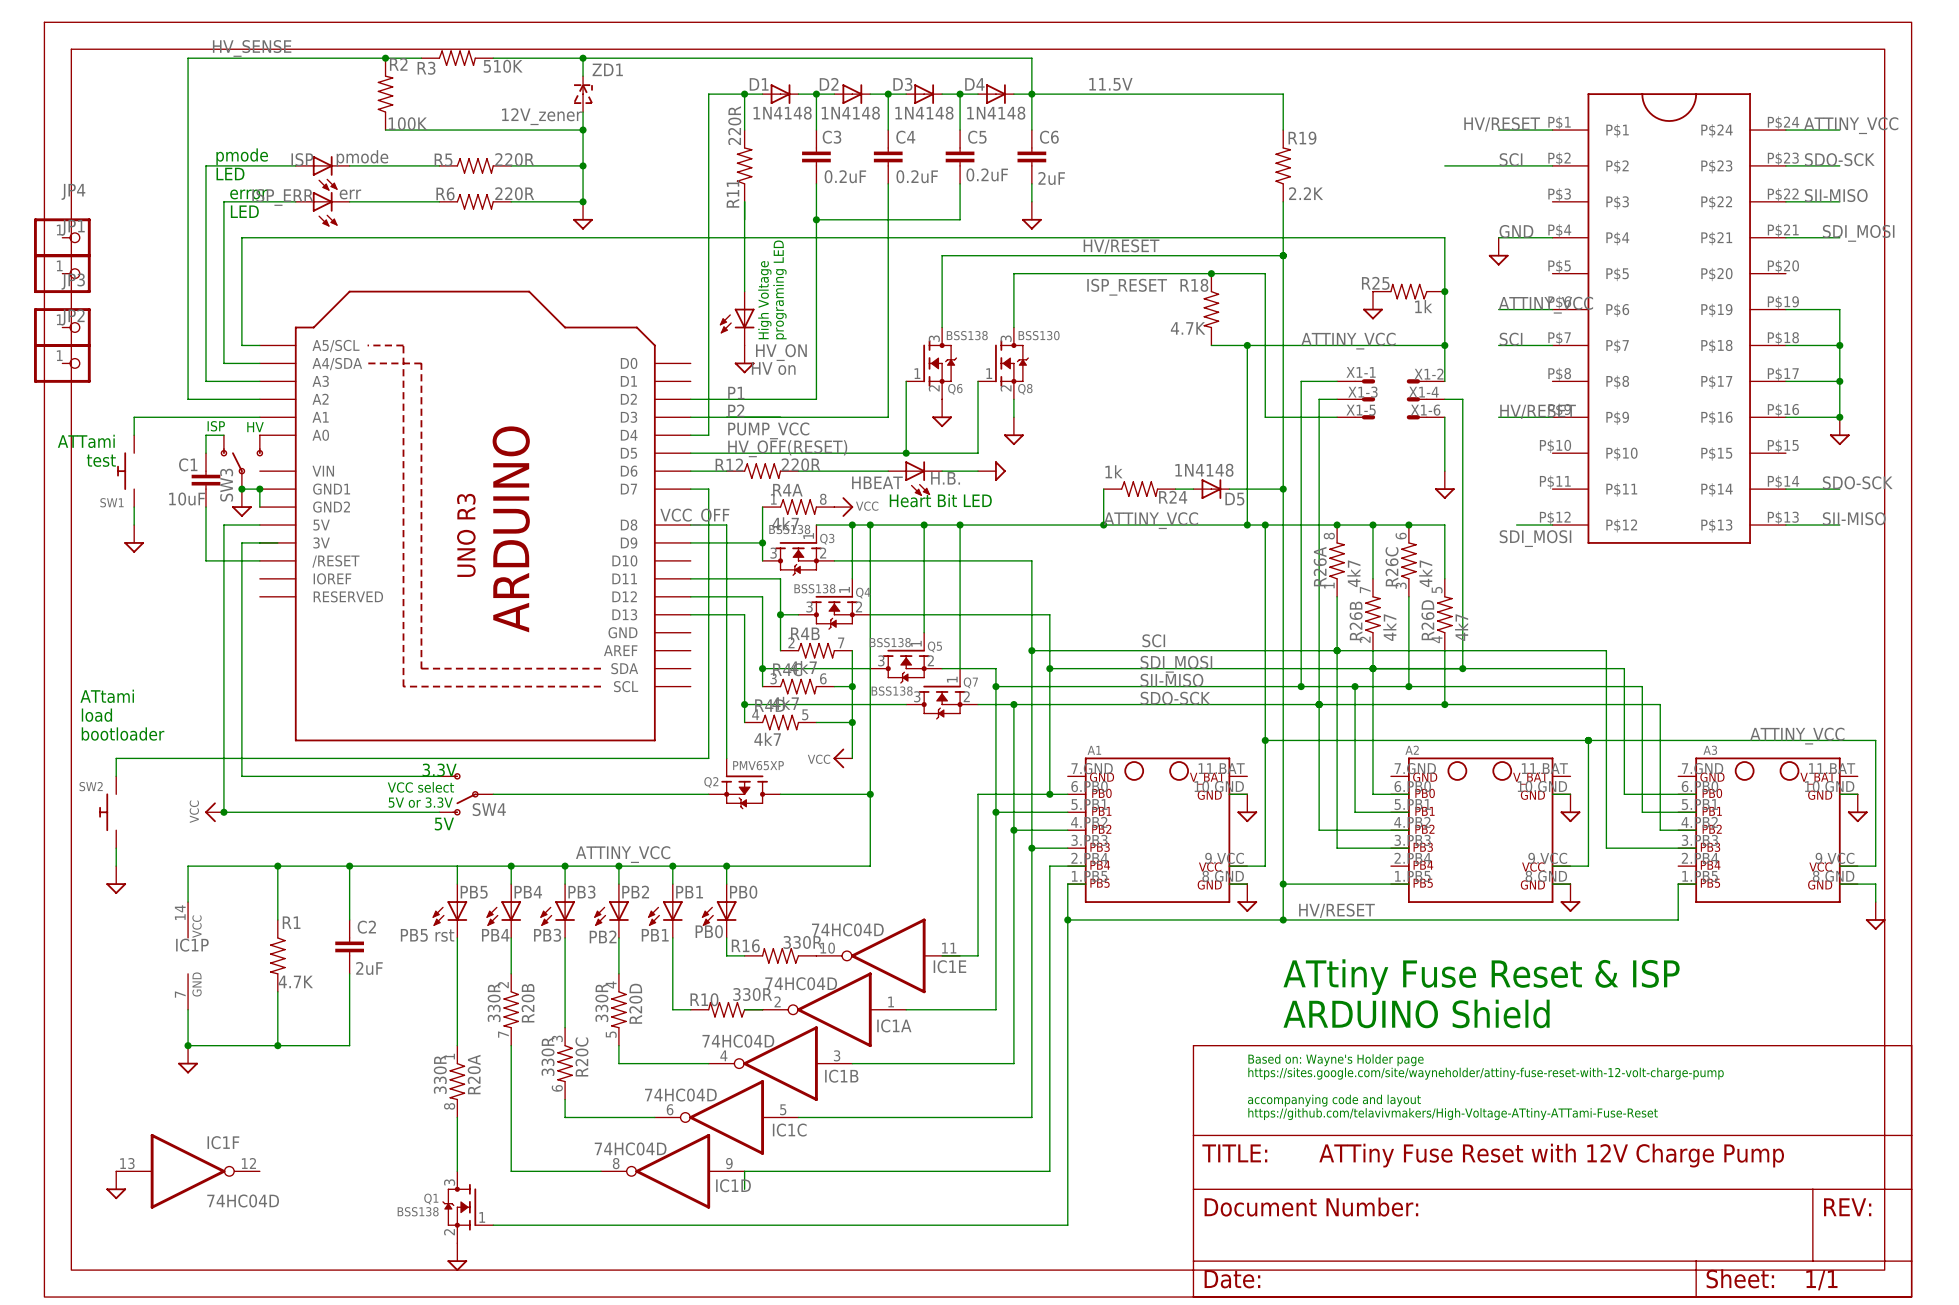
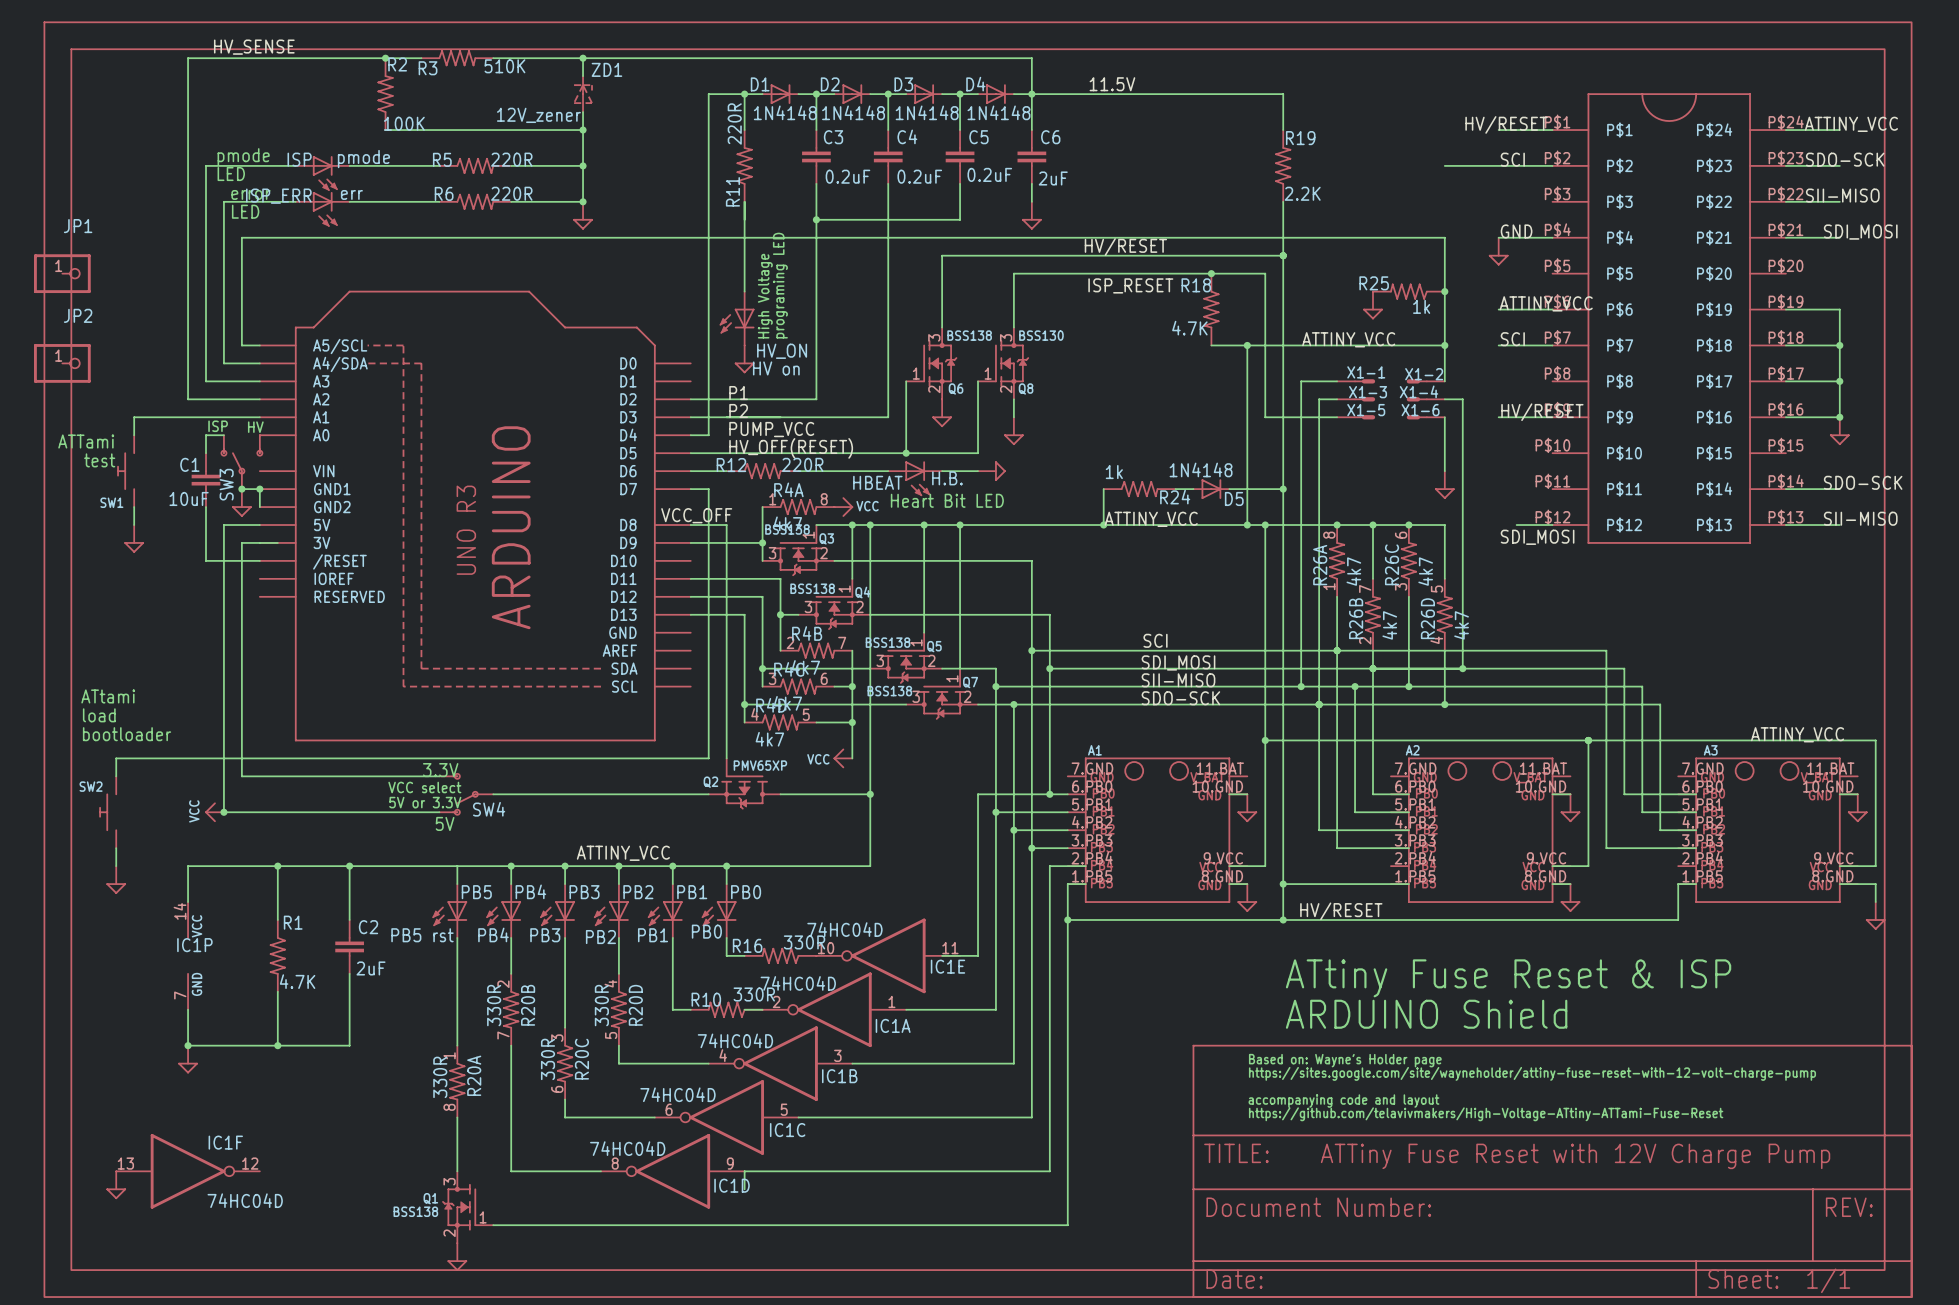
JP4: (62, 237) -> none
JP3: (62, 327) -> none

